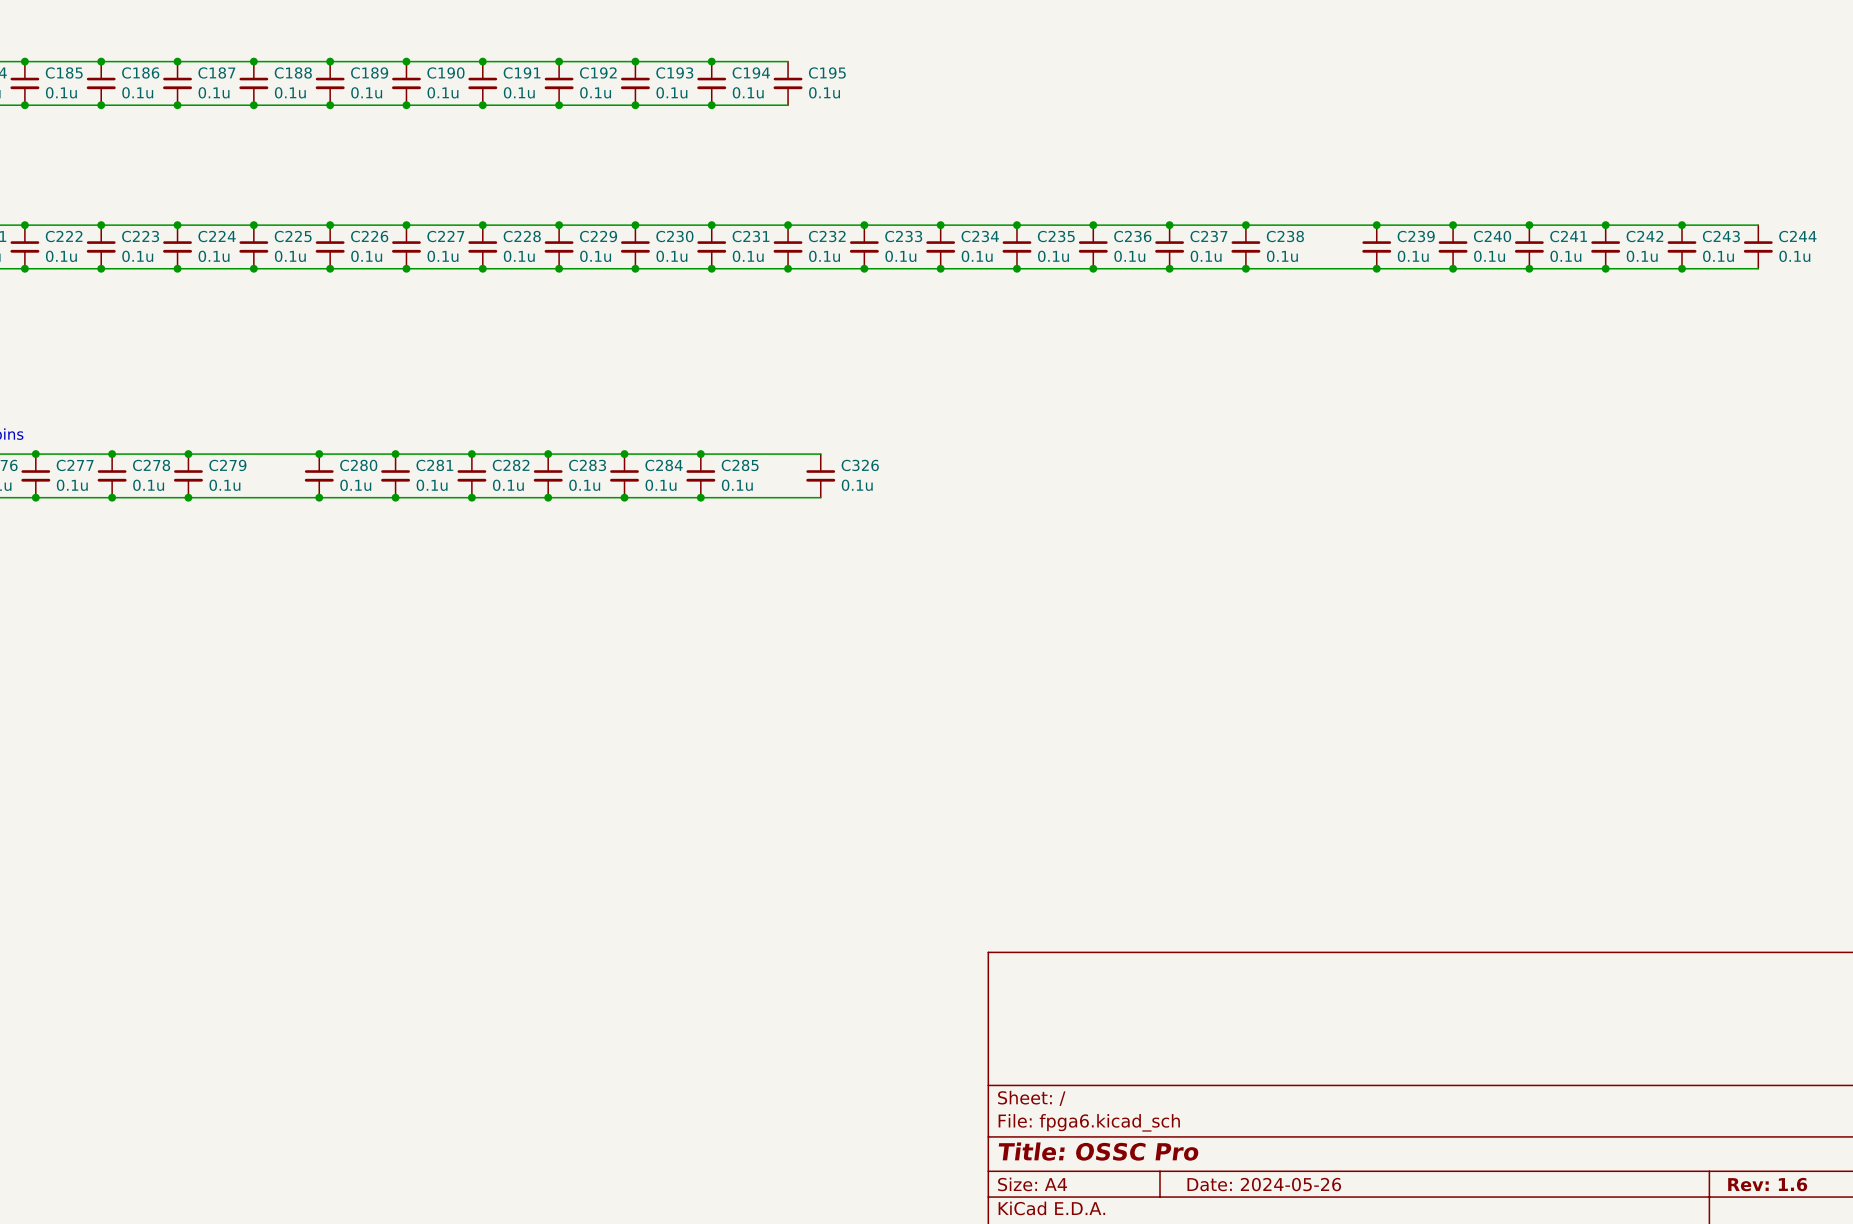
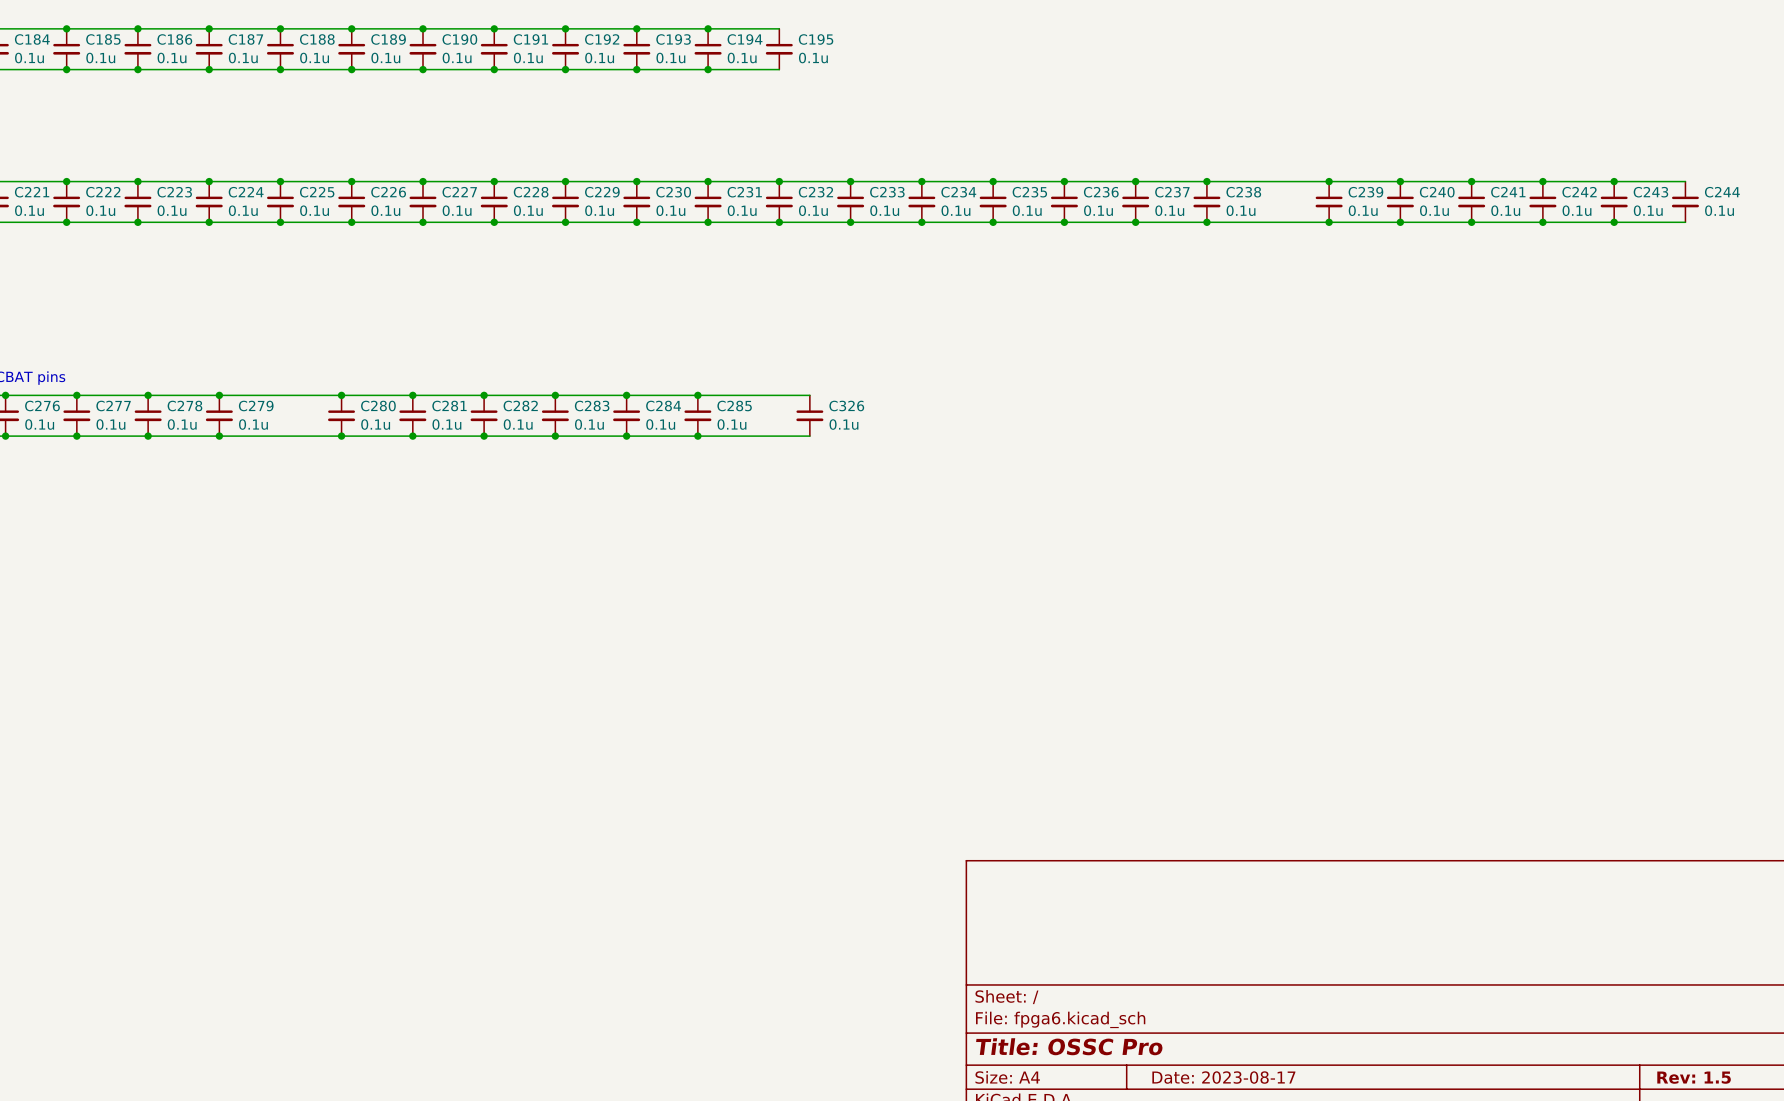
title block: Date: 2024-05-26 (1264, 1184) -> Date: 2023-08-17 (1223, 1077)
title block: Rev: 1.6 (1767, 1184) -> Rev: 1.5 (1694, 1077)

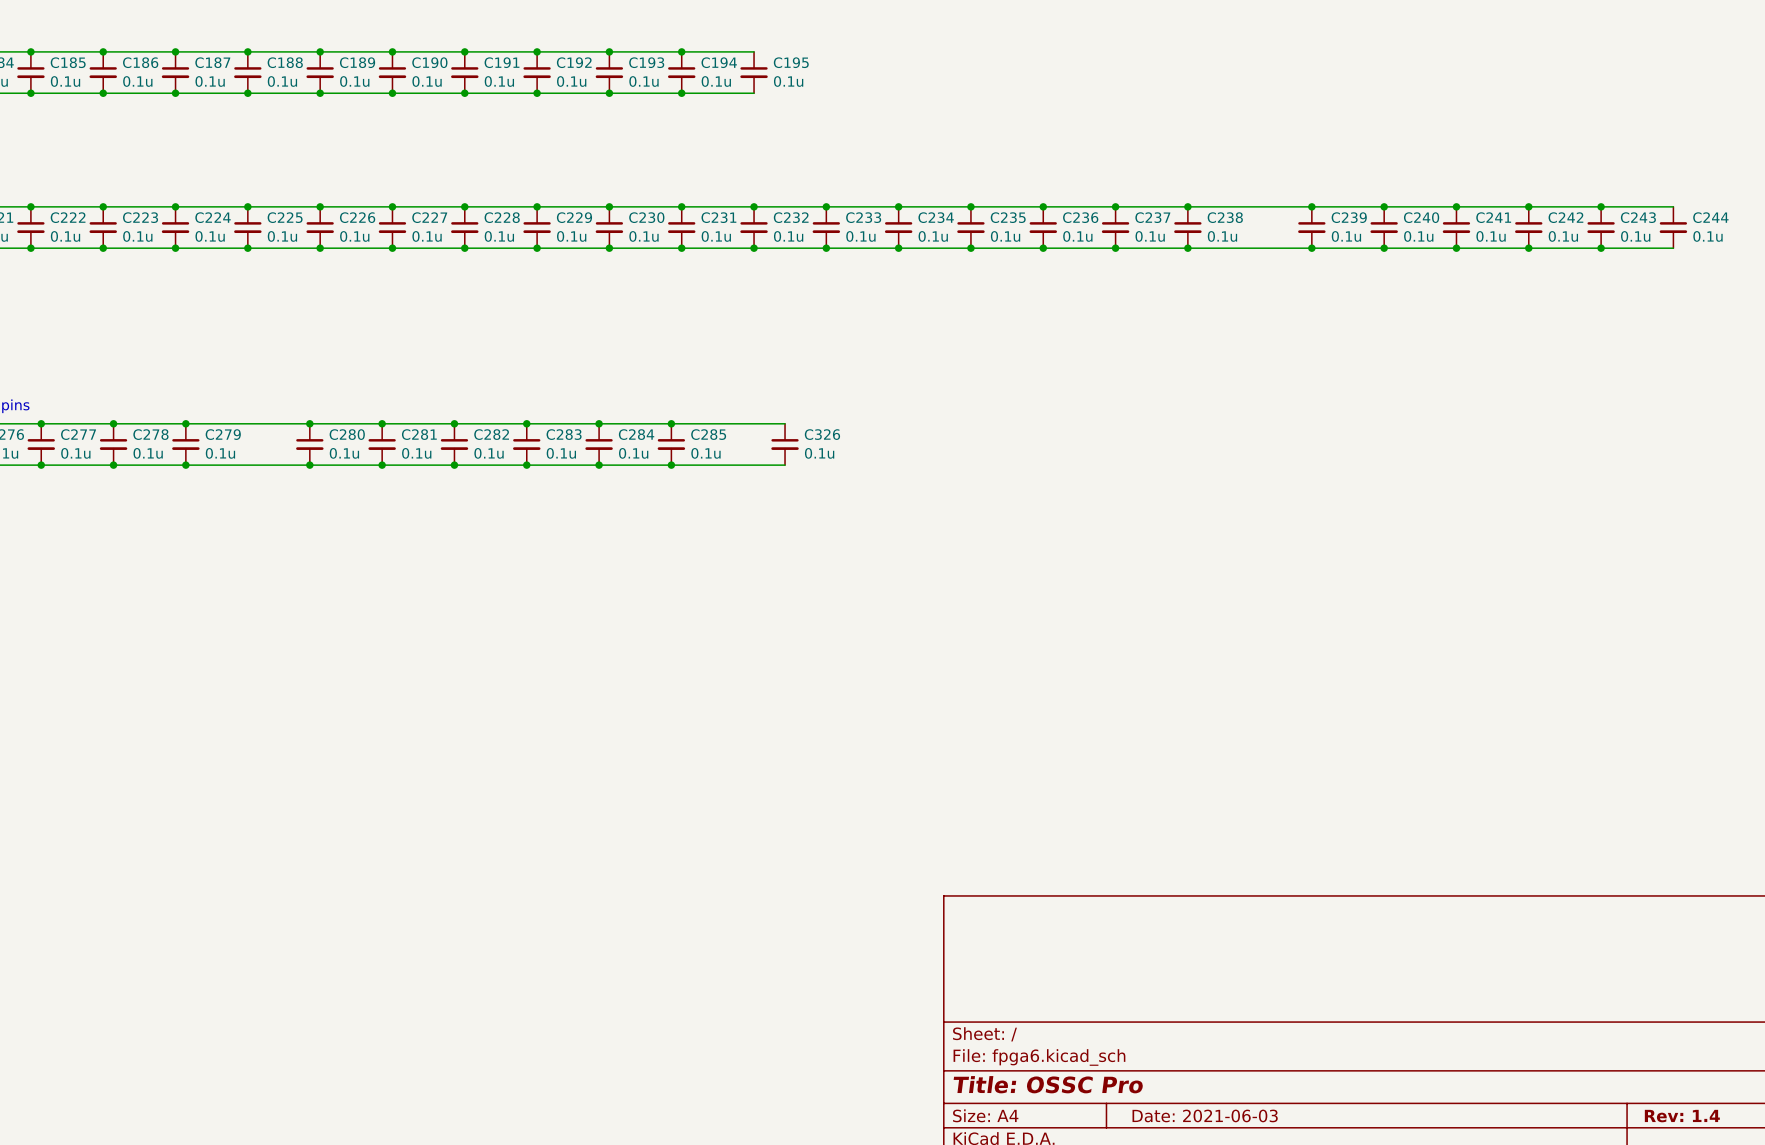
title block: Date: 2023-08-17 (1223, 1077) -> Date: 2021-06-03 (1205, 1115)
title block: Rev: 1.5 (1694, 1077) -> Rev: 1.4 (1682, 1116)

